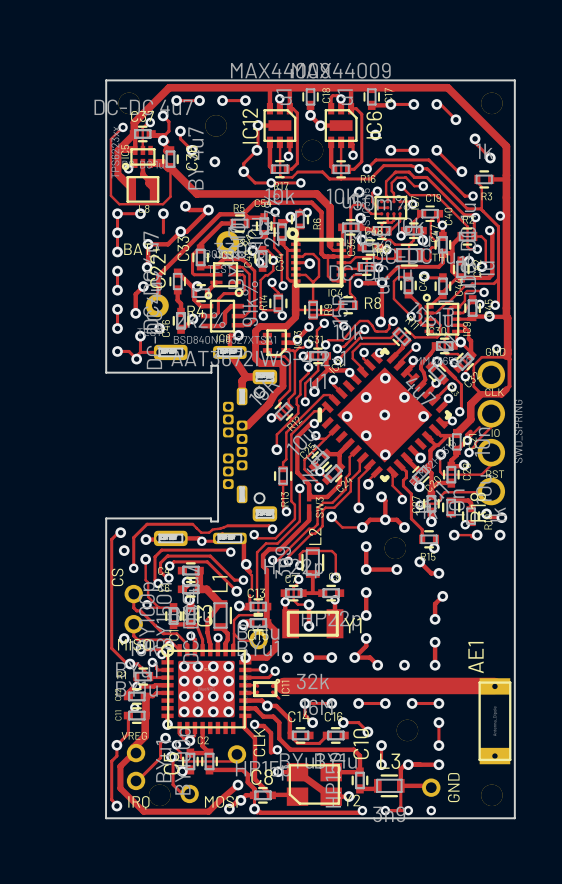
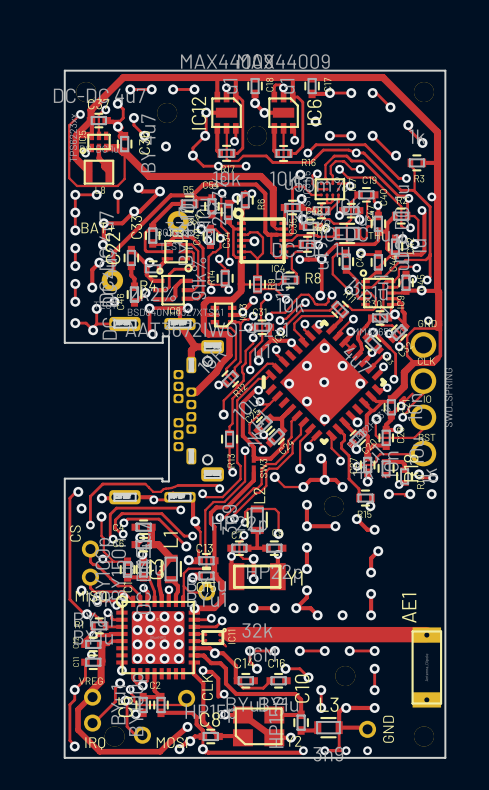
via: none -> (149, 308)
track: none -> (187, 308) (149, 308) (149, 331) (152, 334)
via: none -> (152, 334)

